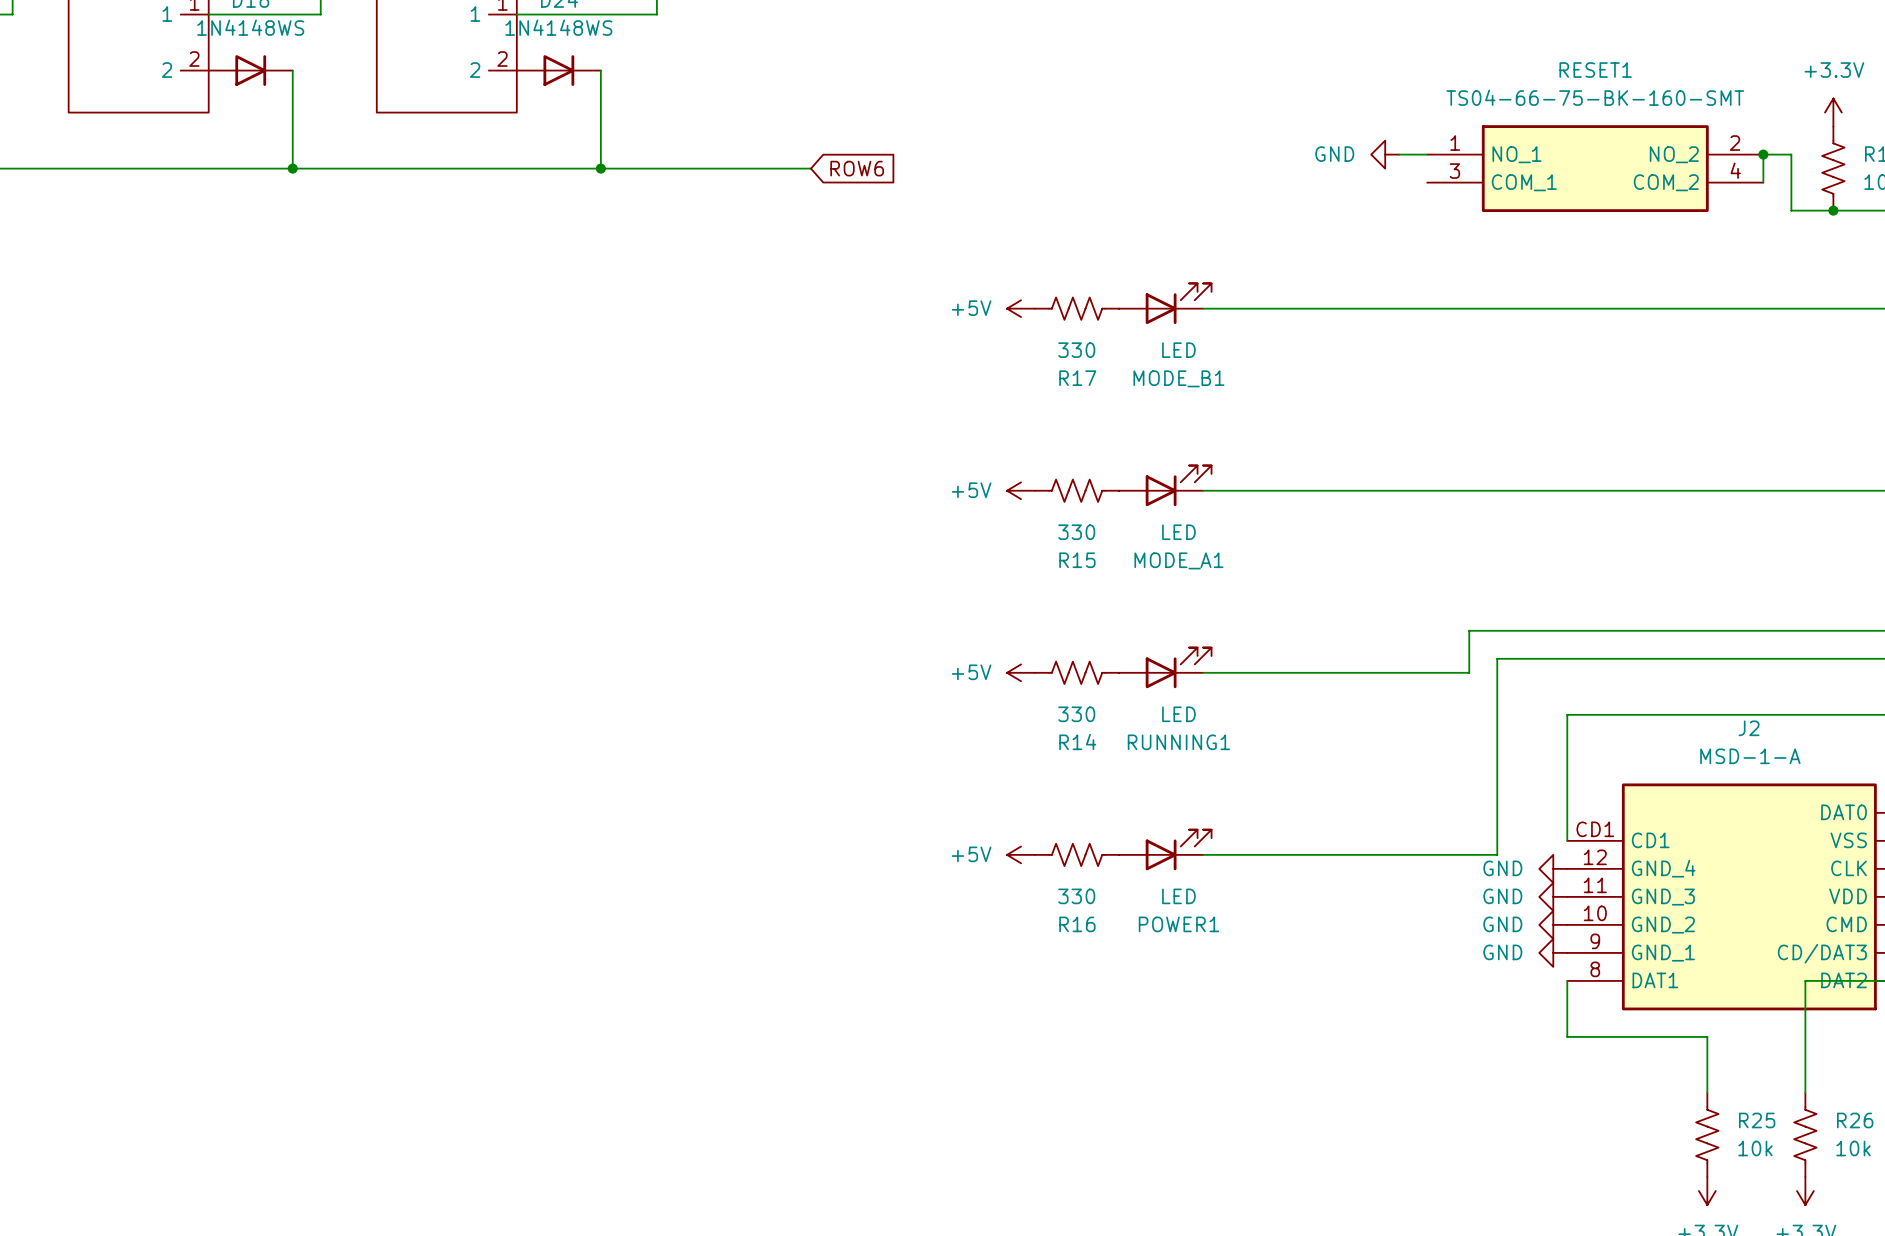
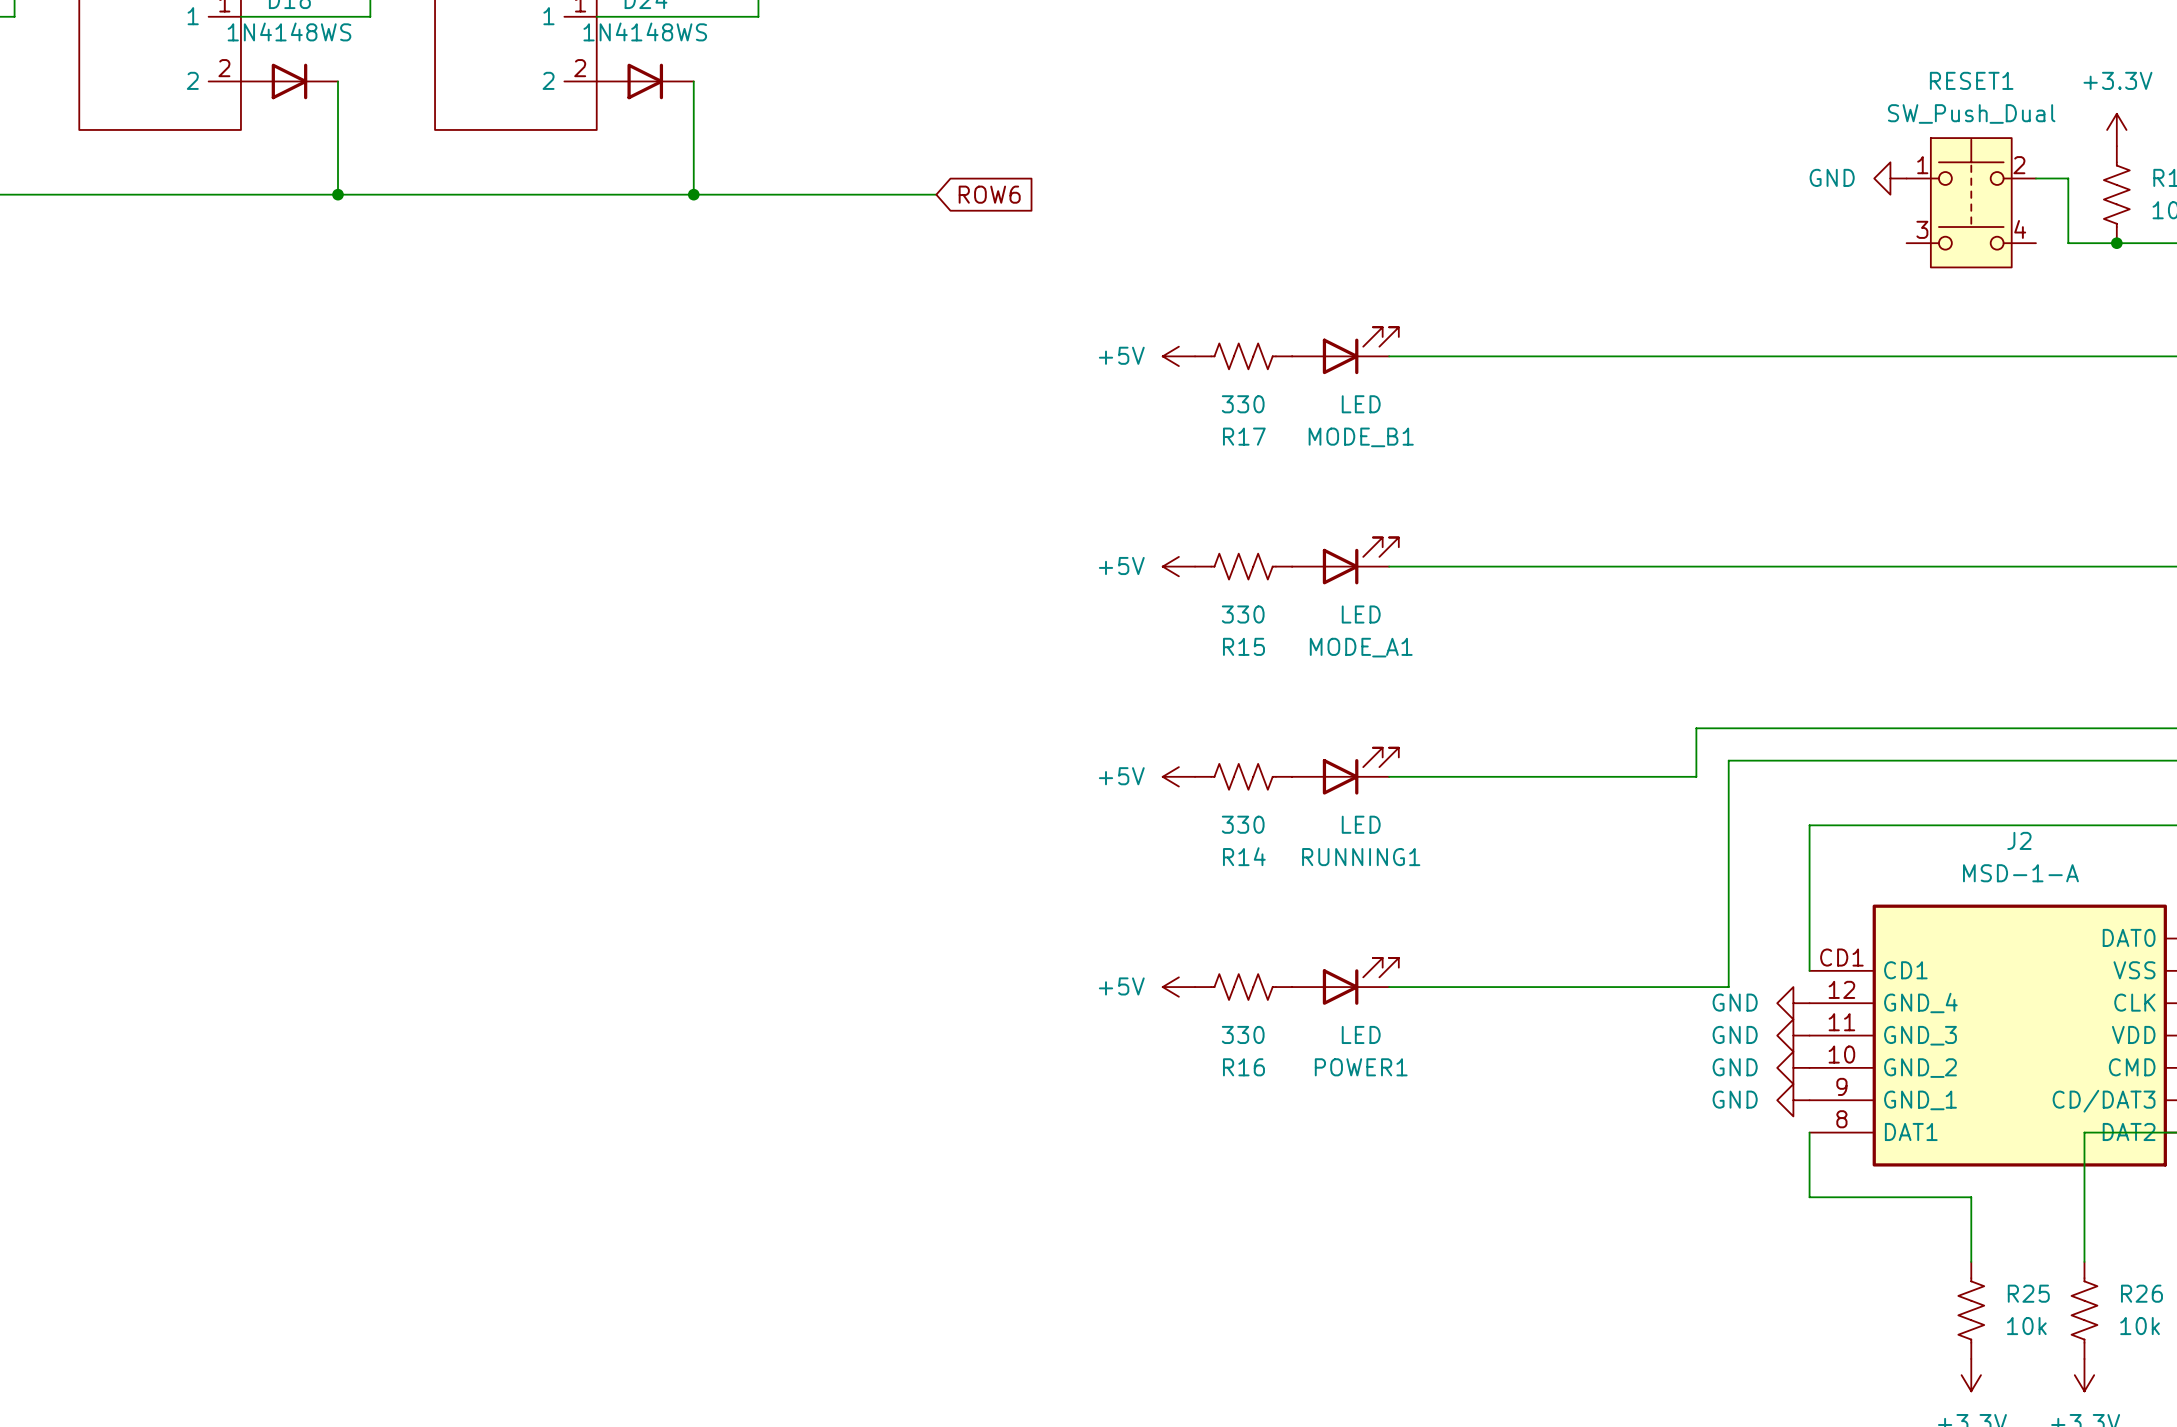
RESET1 value: TS04-66-75-BK-160-SMT (1595, 97) -> SW_Push_Dual (1971, 113)
RESET1 symbol: [1427, 125, 1764, 213] -> [1906, 138, 2036, 268]
power symbol position: GND (1385, 154) -> GND (1890, 178)
wire: (1399, 154) (1427, 154) -> none
wire: (1763, 154) (1763, 182) -> none
junction: (1763, 154) -> none

